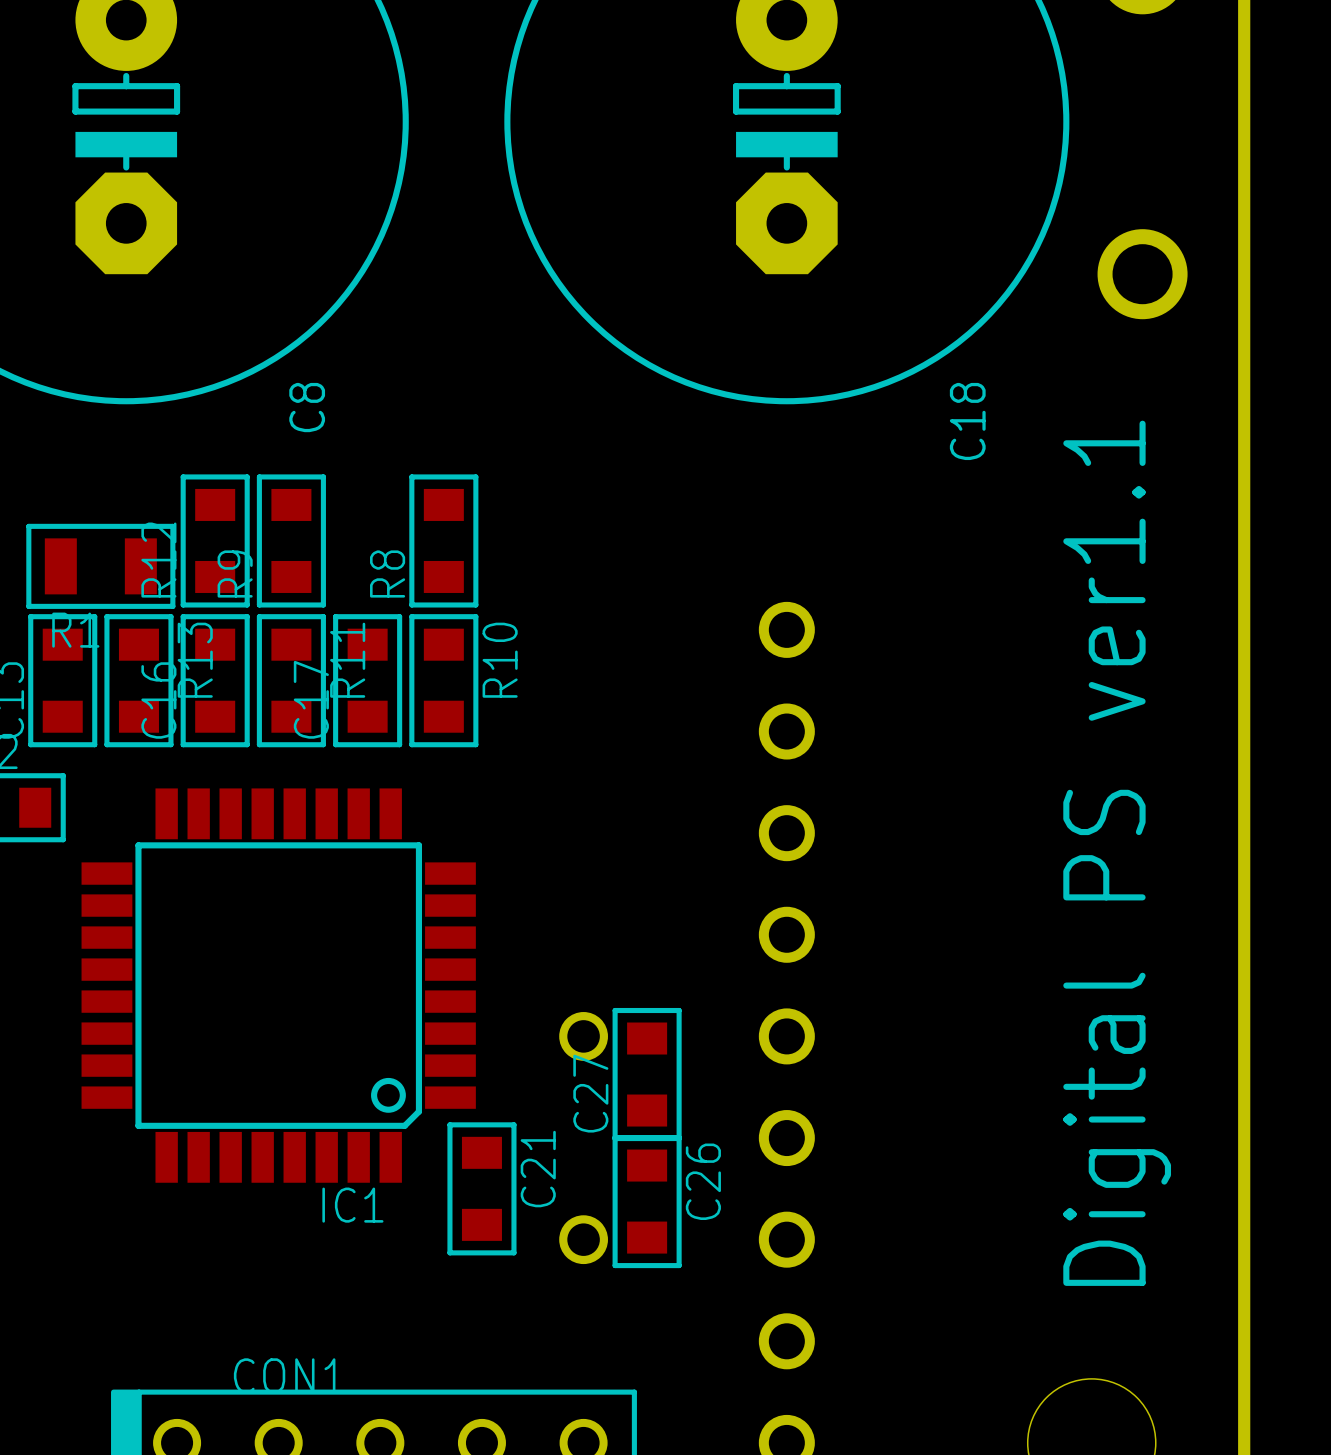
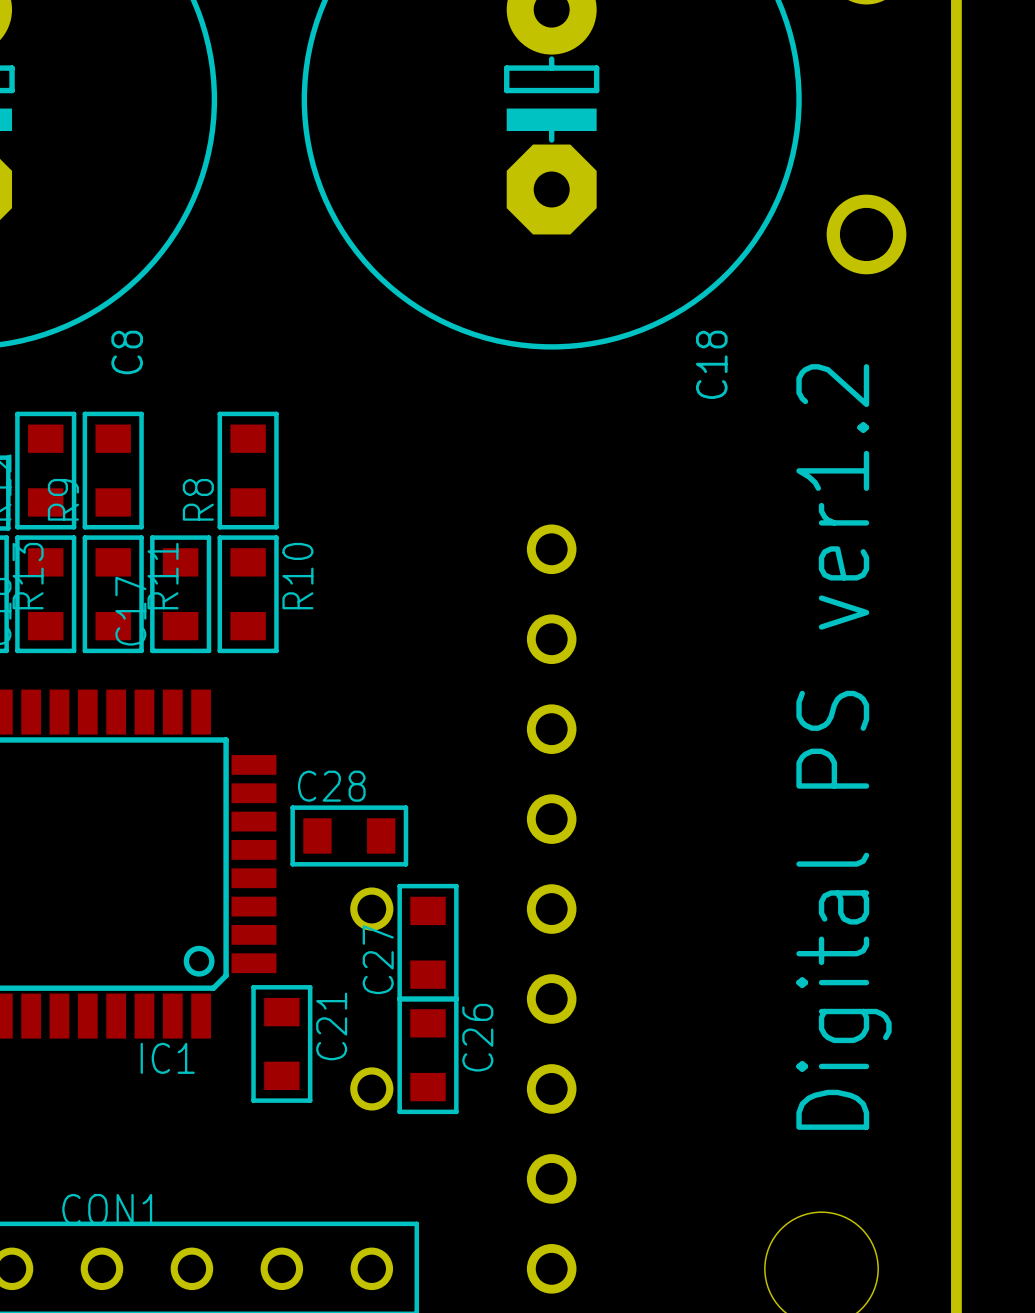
text: Digital PS ver1.1 (1117, 853) -> Digital PS ver1.2 (844, 746)
C28: none -> (349, 835)

